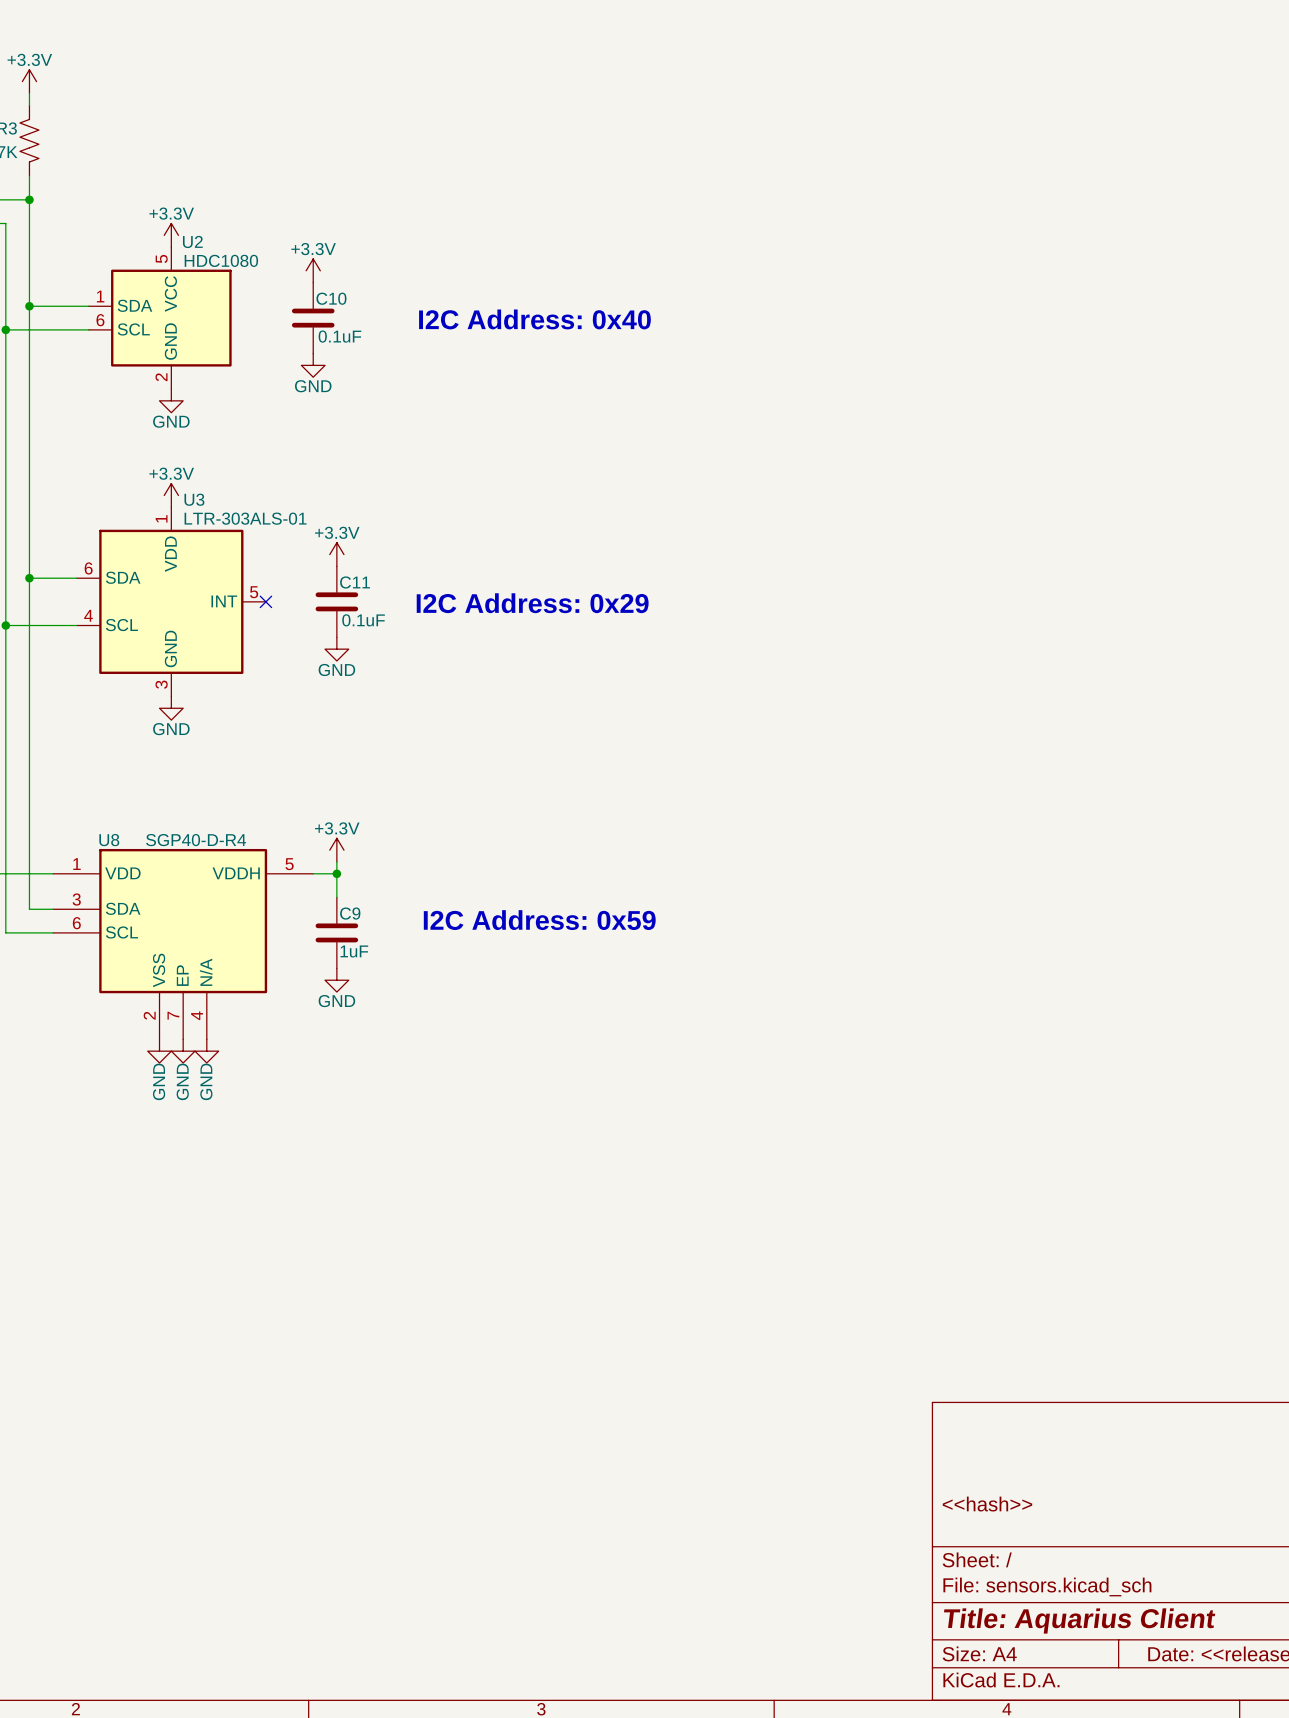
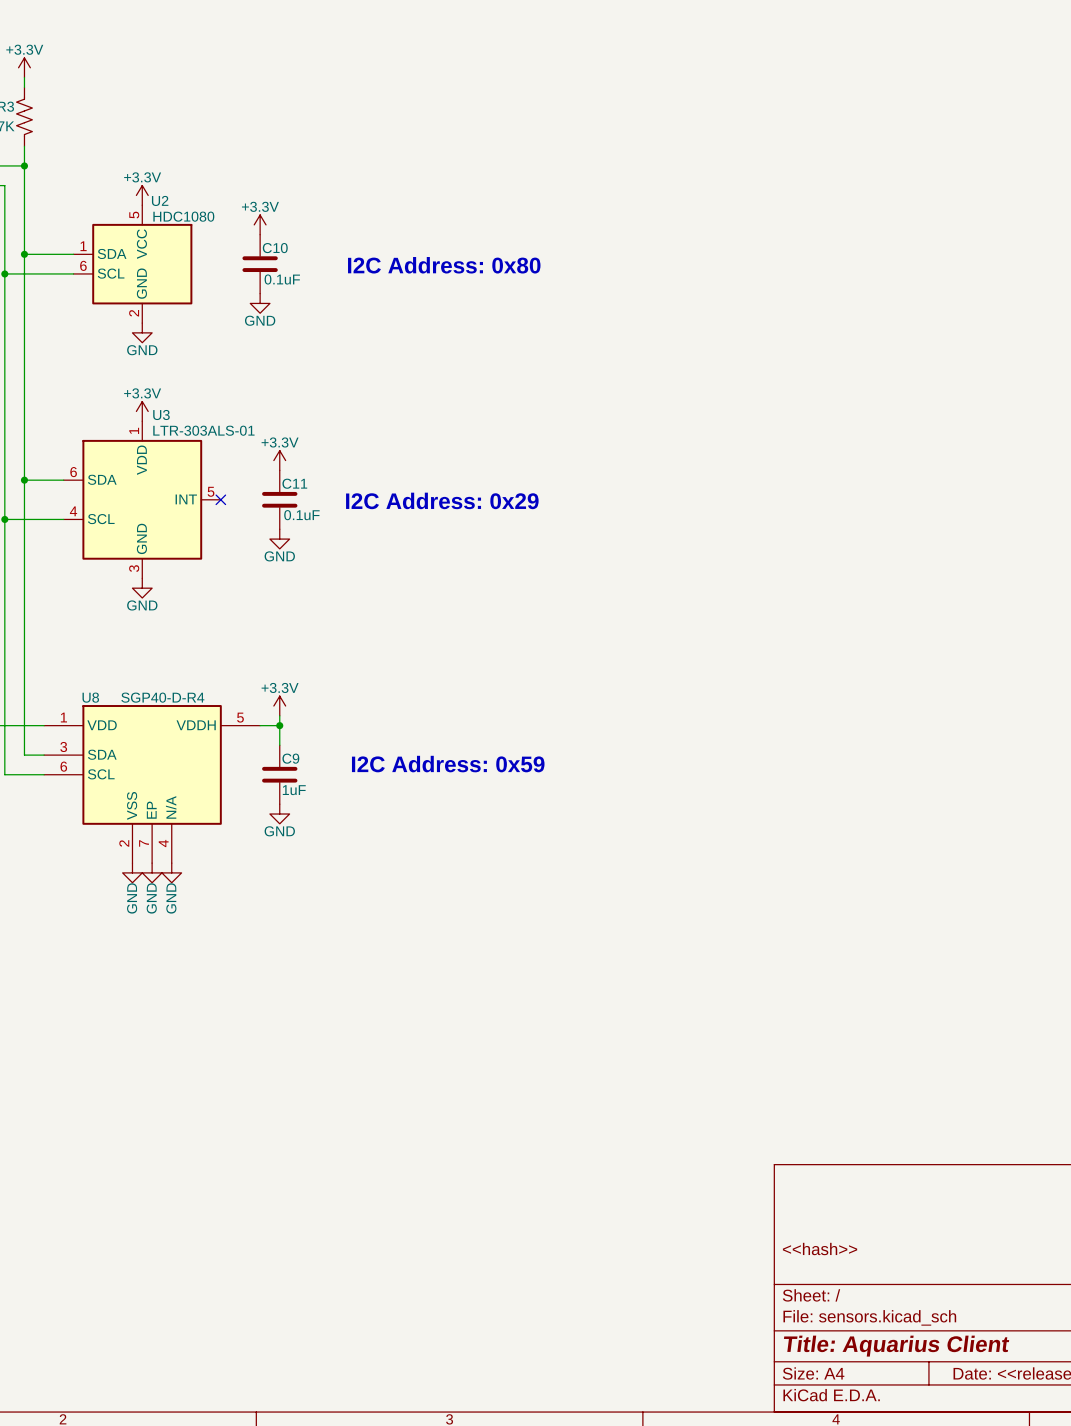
text: I2C Address: 0x40 (534, 319) -> I2C Address: 0x80 (444, 265)

